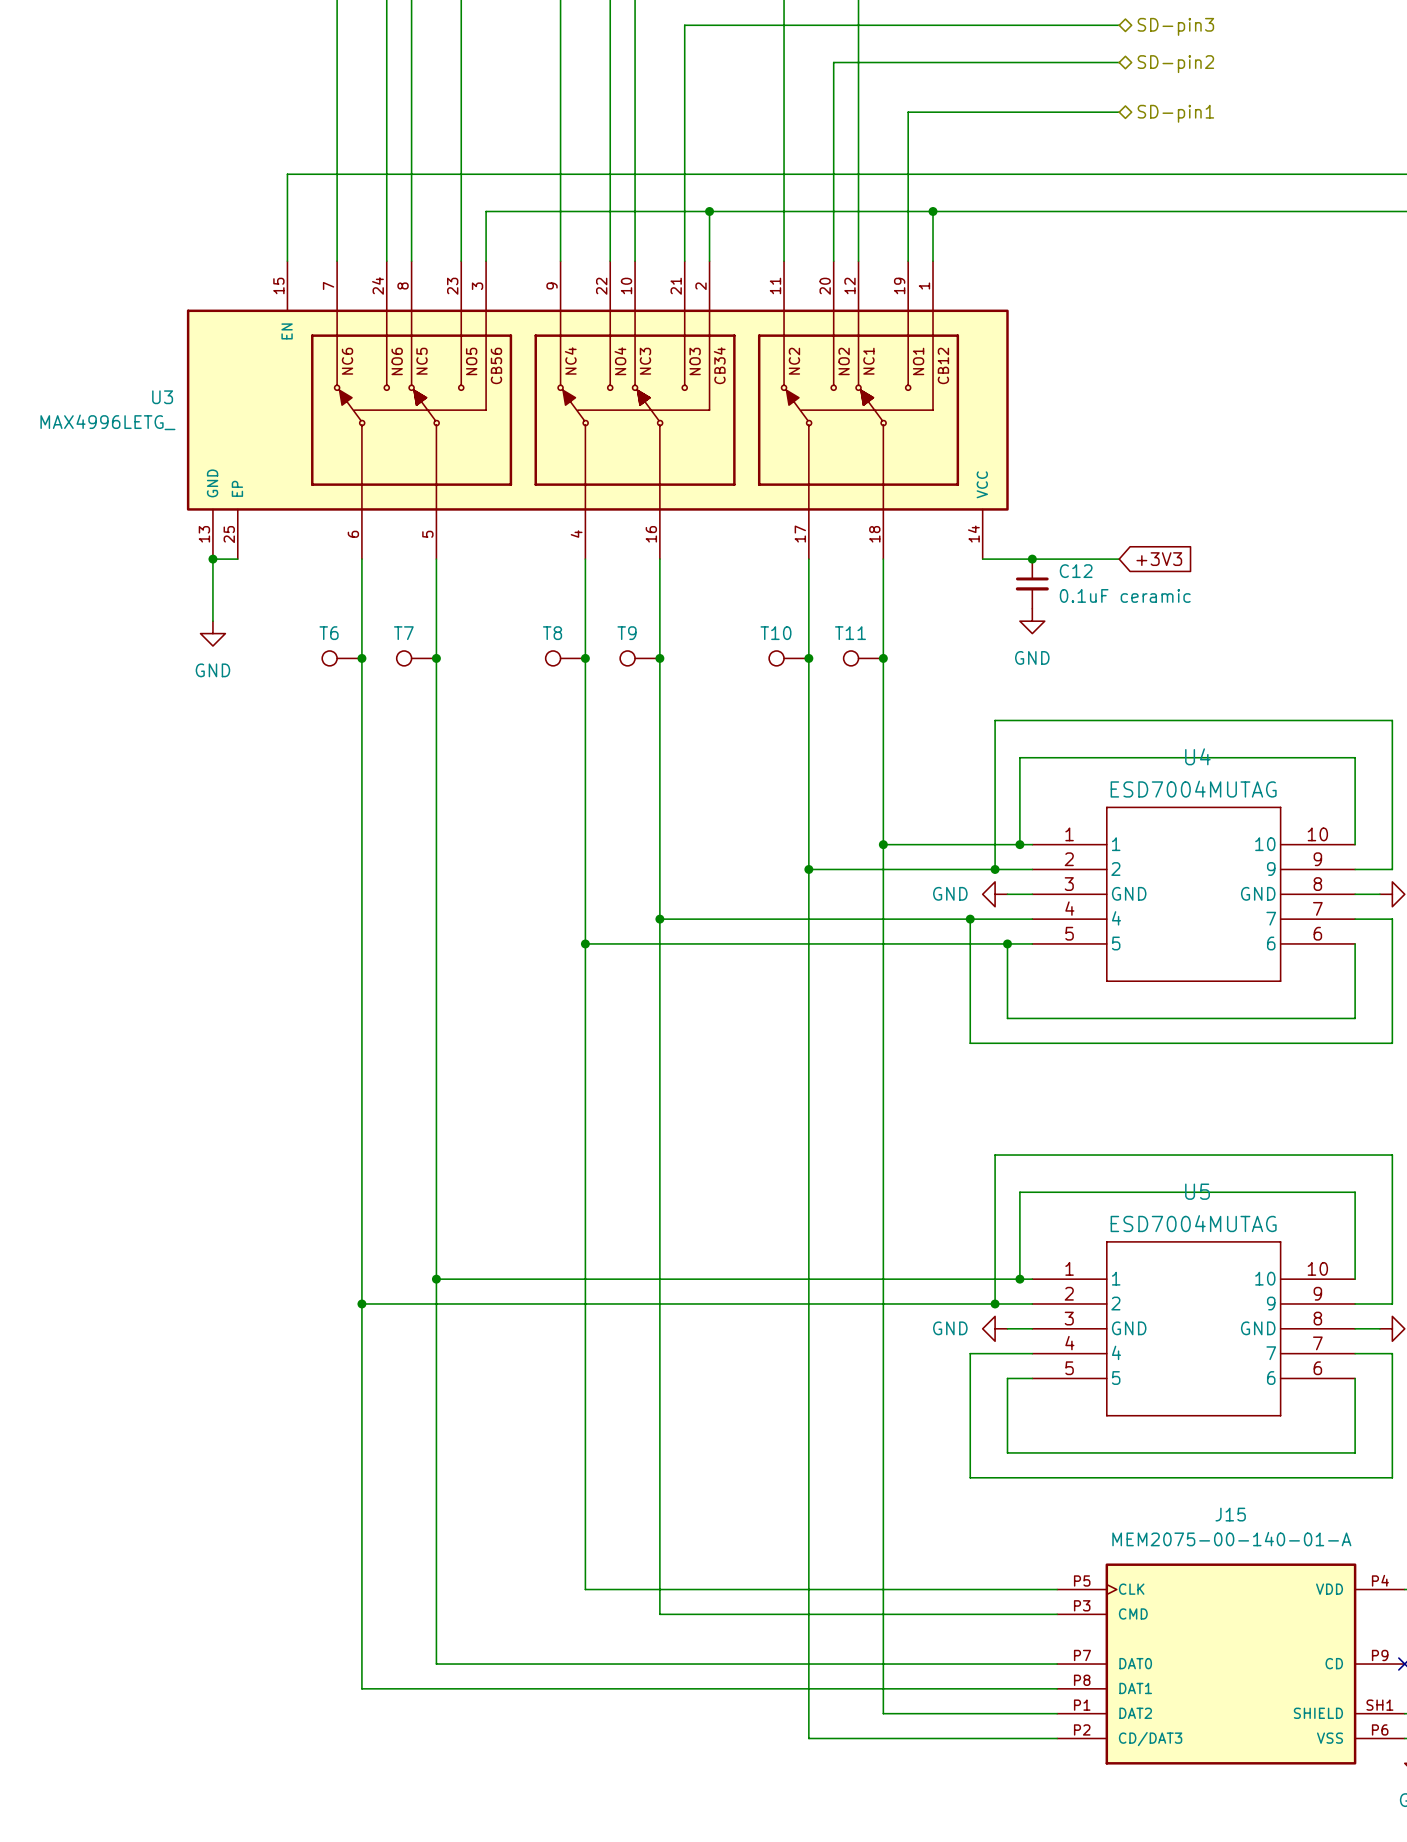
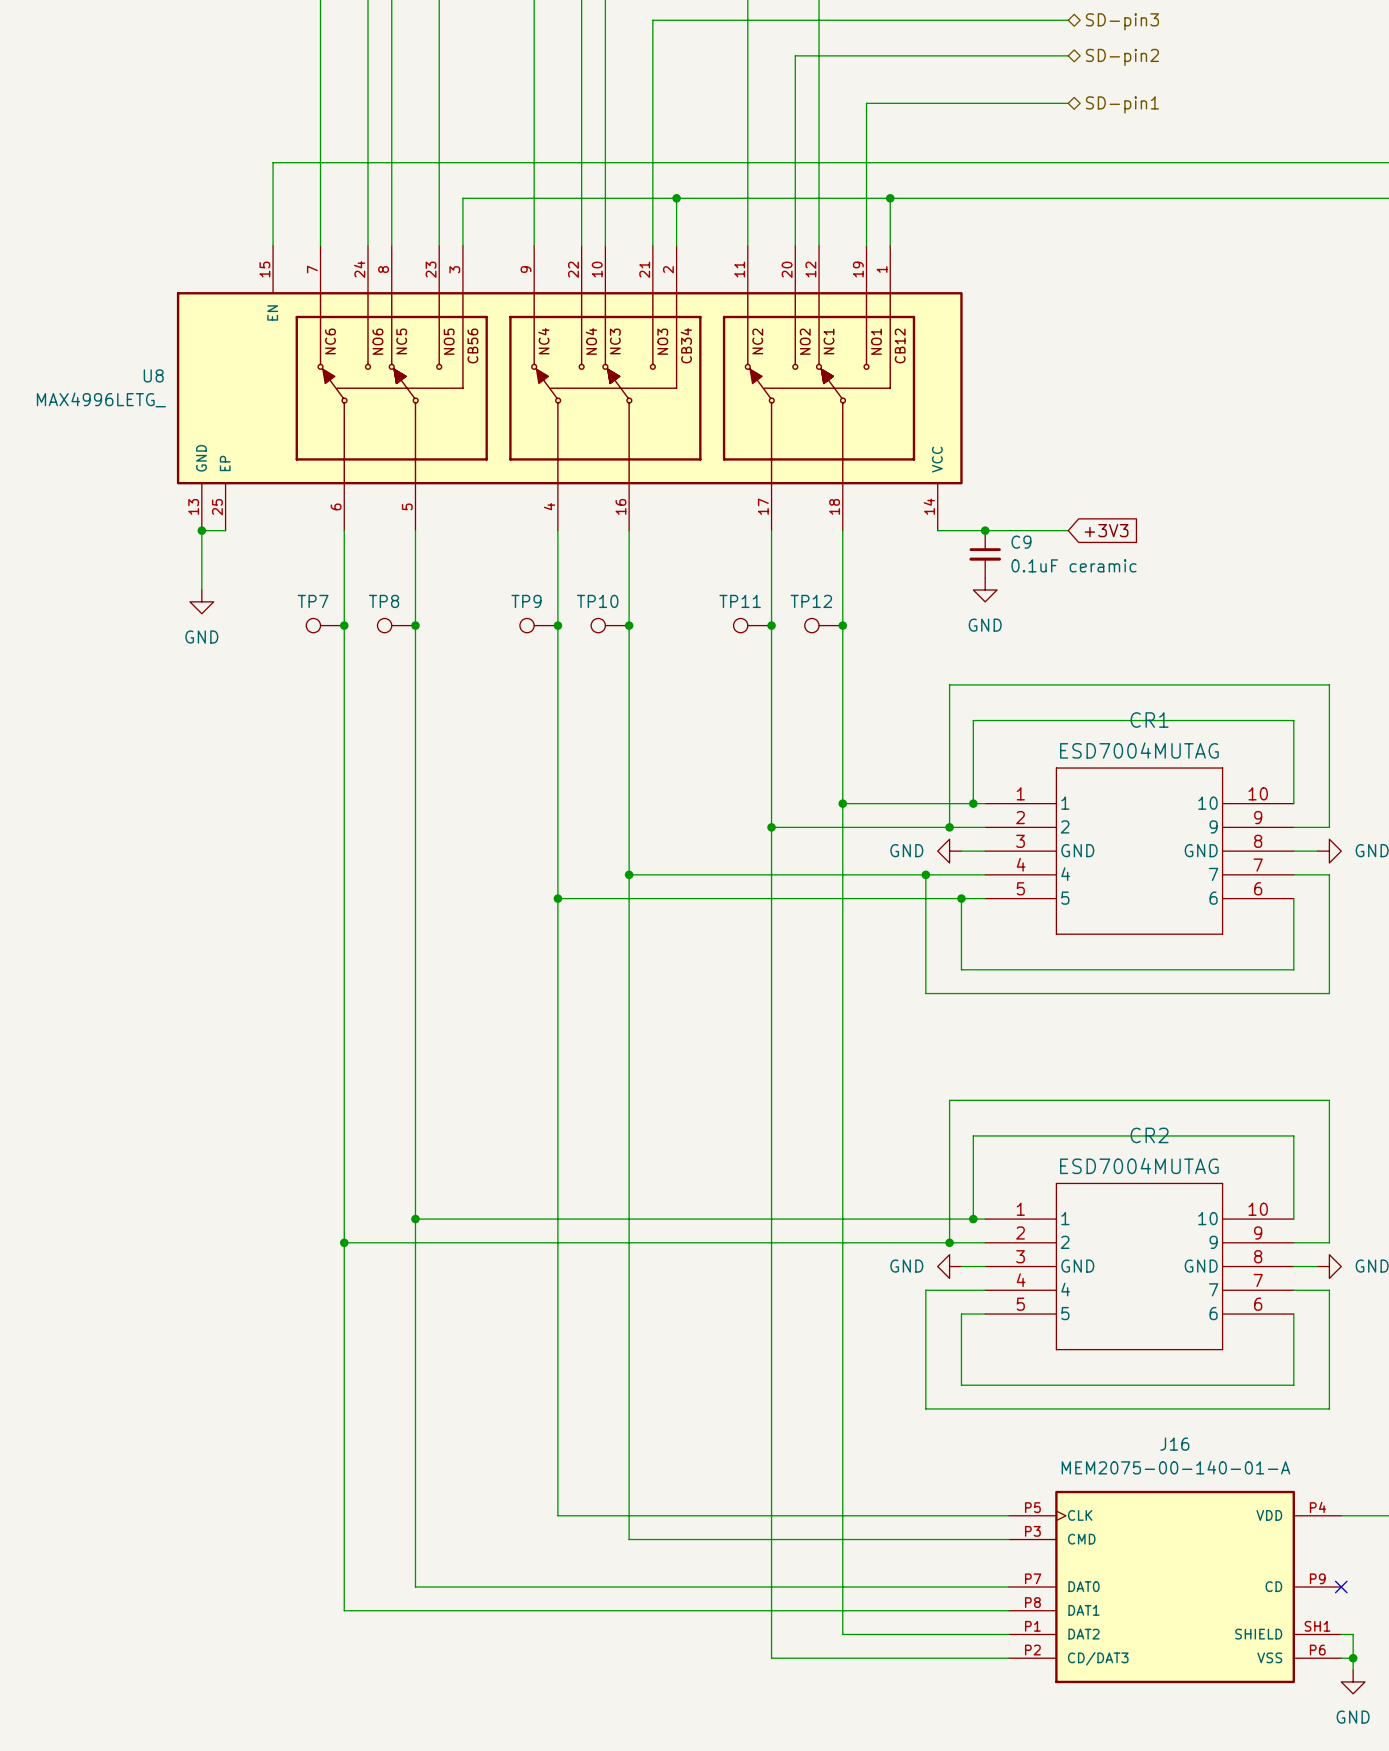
U3 name: U3 (162, 397) -> U8 (153, 375)
C12 name: C12 (1076, 571) -> C9 (1021, 542)
T6 name: T6 (329, 633) -> TP7 (313, 601)
T7 name: T7 (403, 633) -> TP8 (384, 601)
T8 name: T8 (552, 633) -> TP9 (526, 601)
T9 name: T9 (627, 633) -> TP10 (597, 601)
T10 name: T10 (775, 633) -> TP11 (740, 601)
T11 name: T11 (850, 633) -> TP12 (811, 601)
U4 name: U4 (1197, 756) -> CR1 (1149, 720)
U5 name: U5 (1197, 1191) -> CR2 (1149, 1135)
J15 name: J15 (1230, 1514) -> J16 (1174, 1444)

